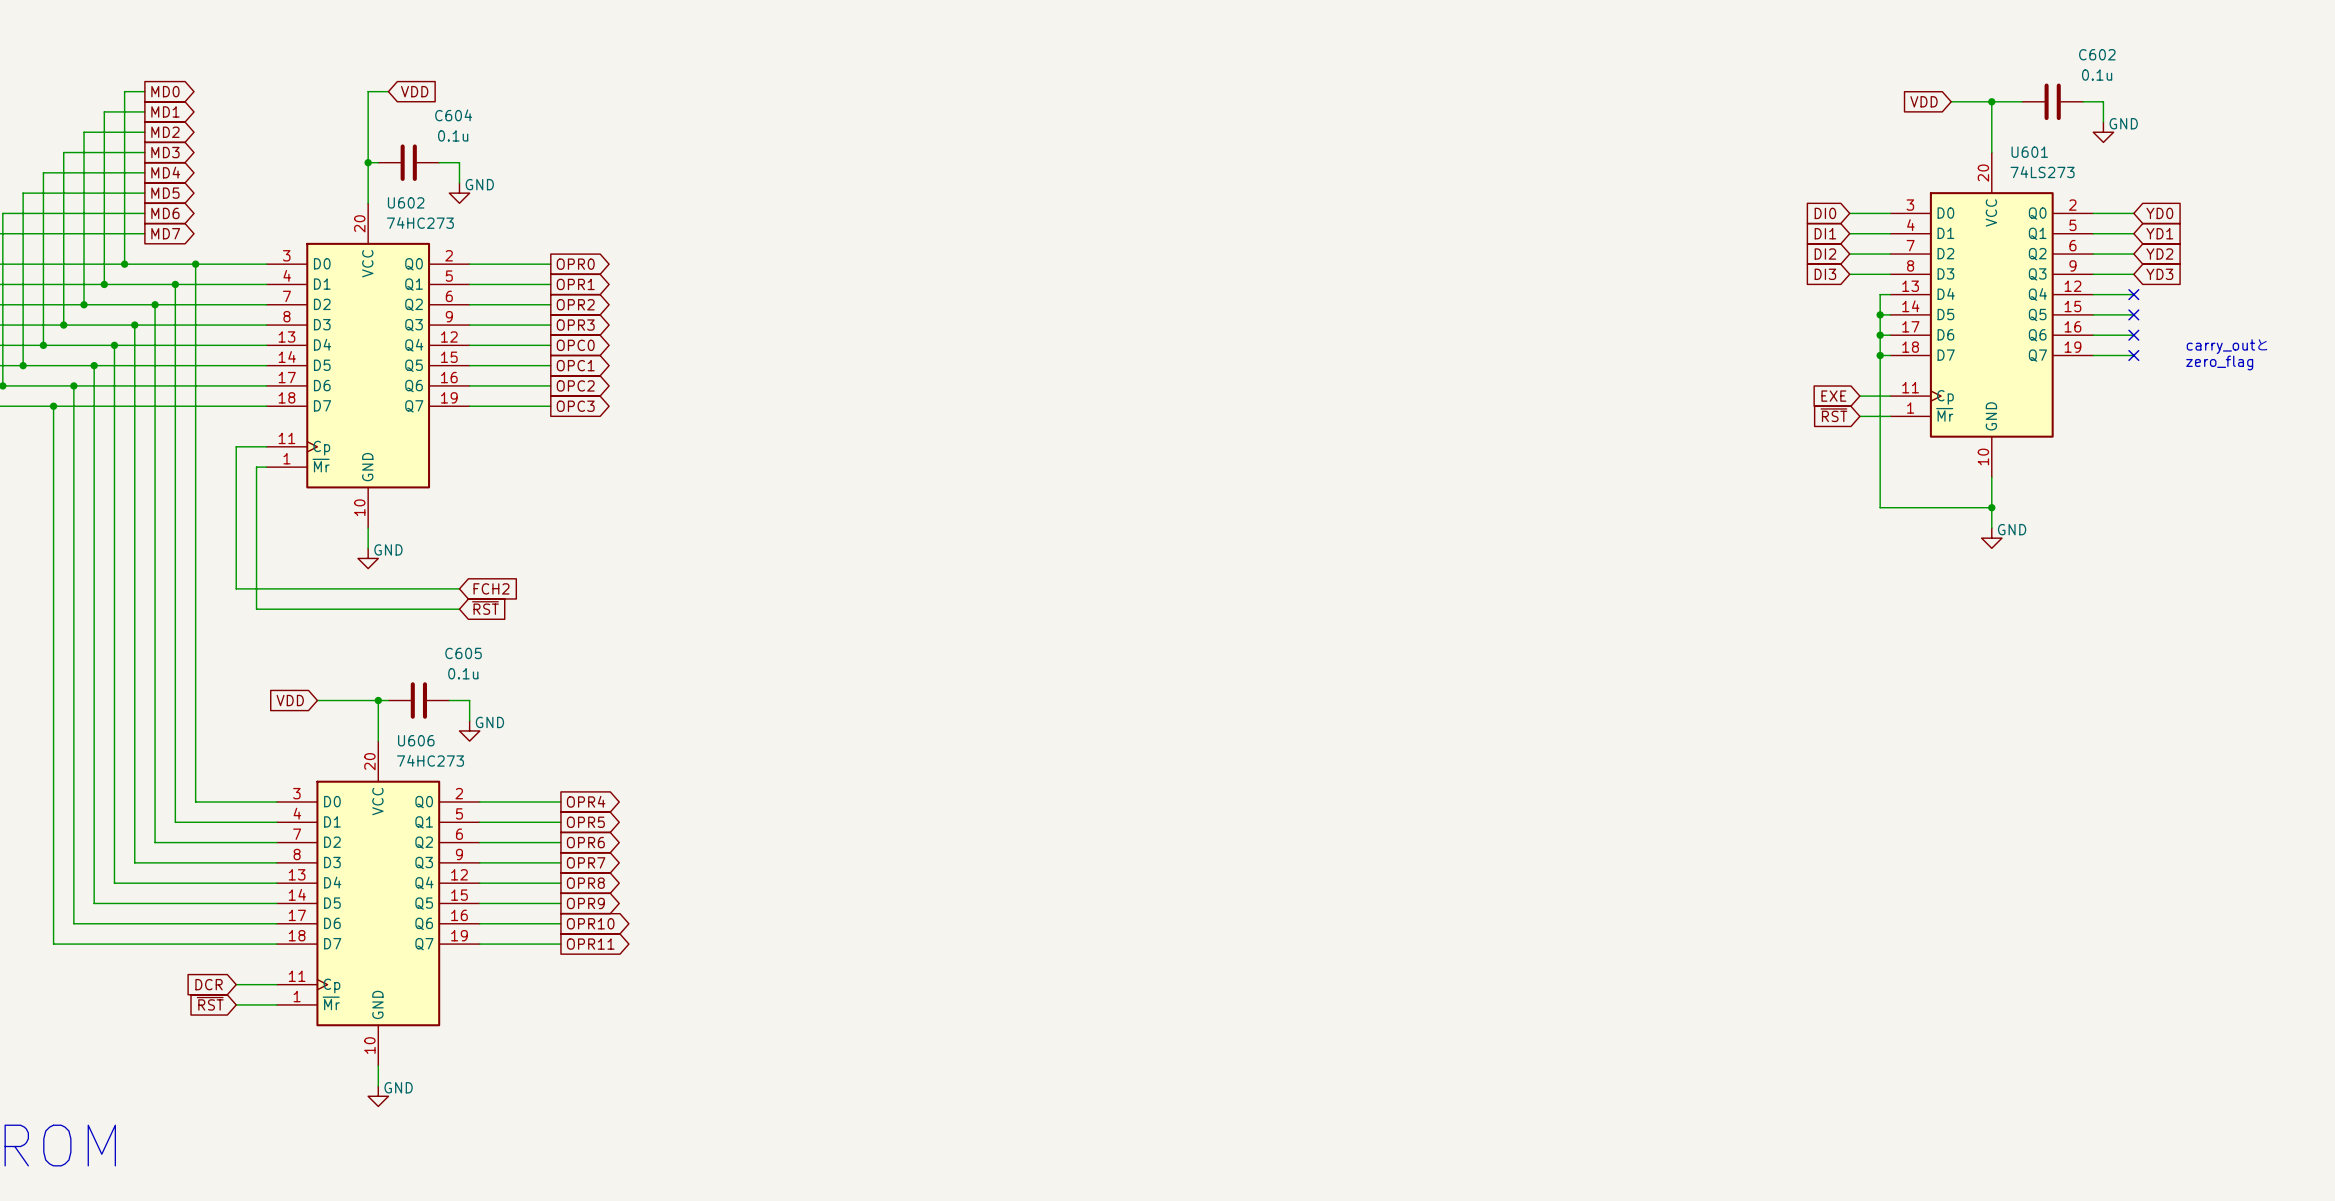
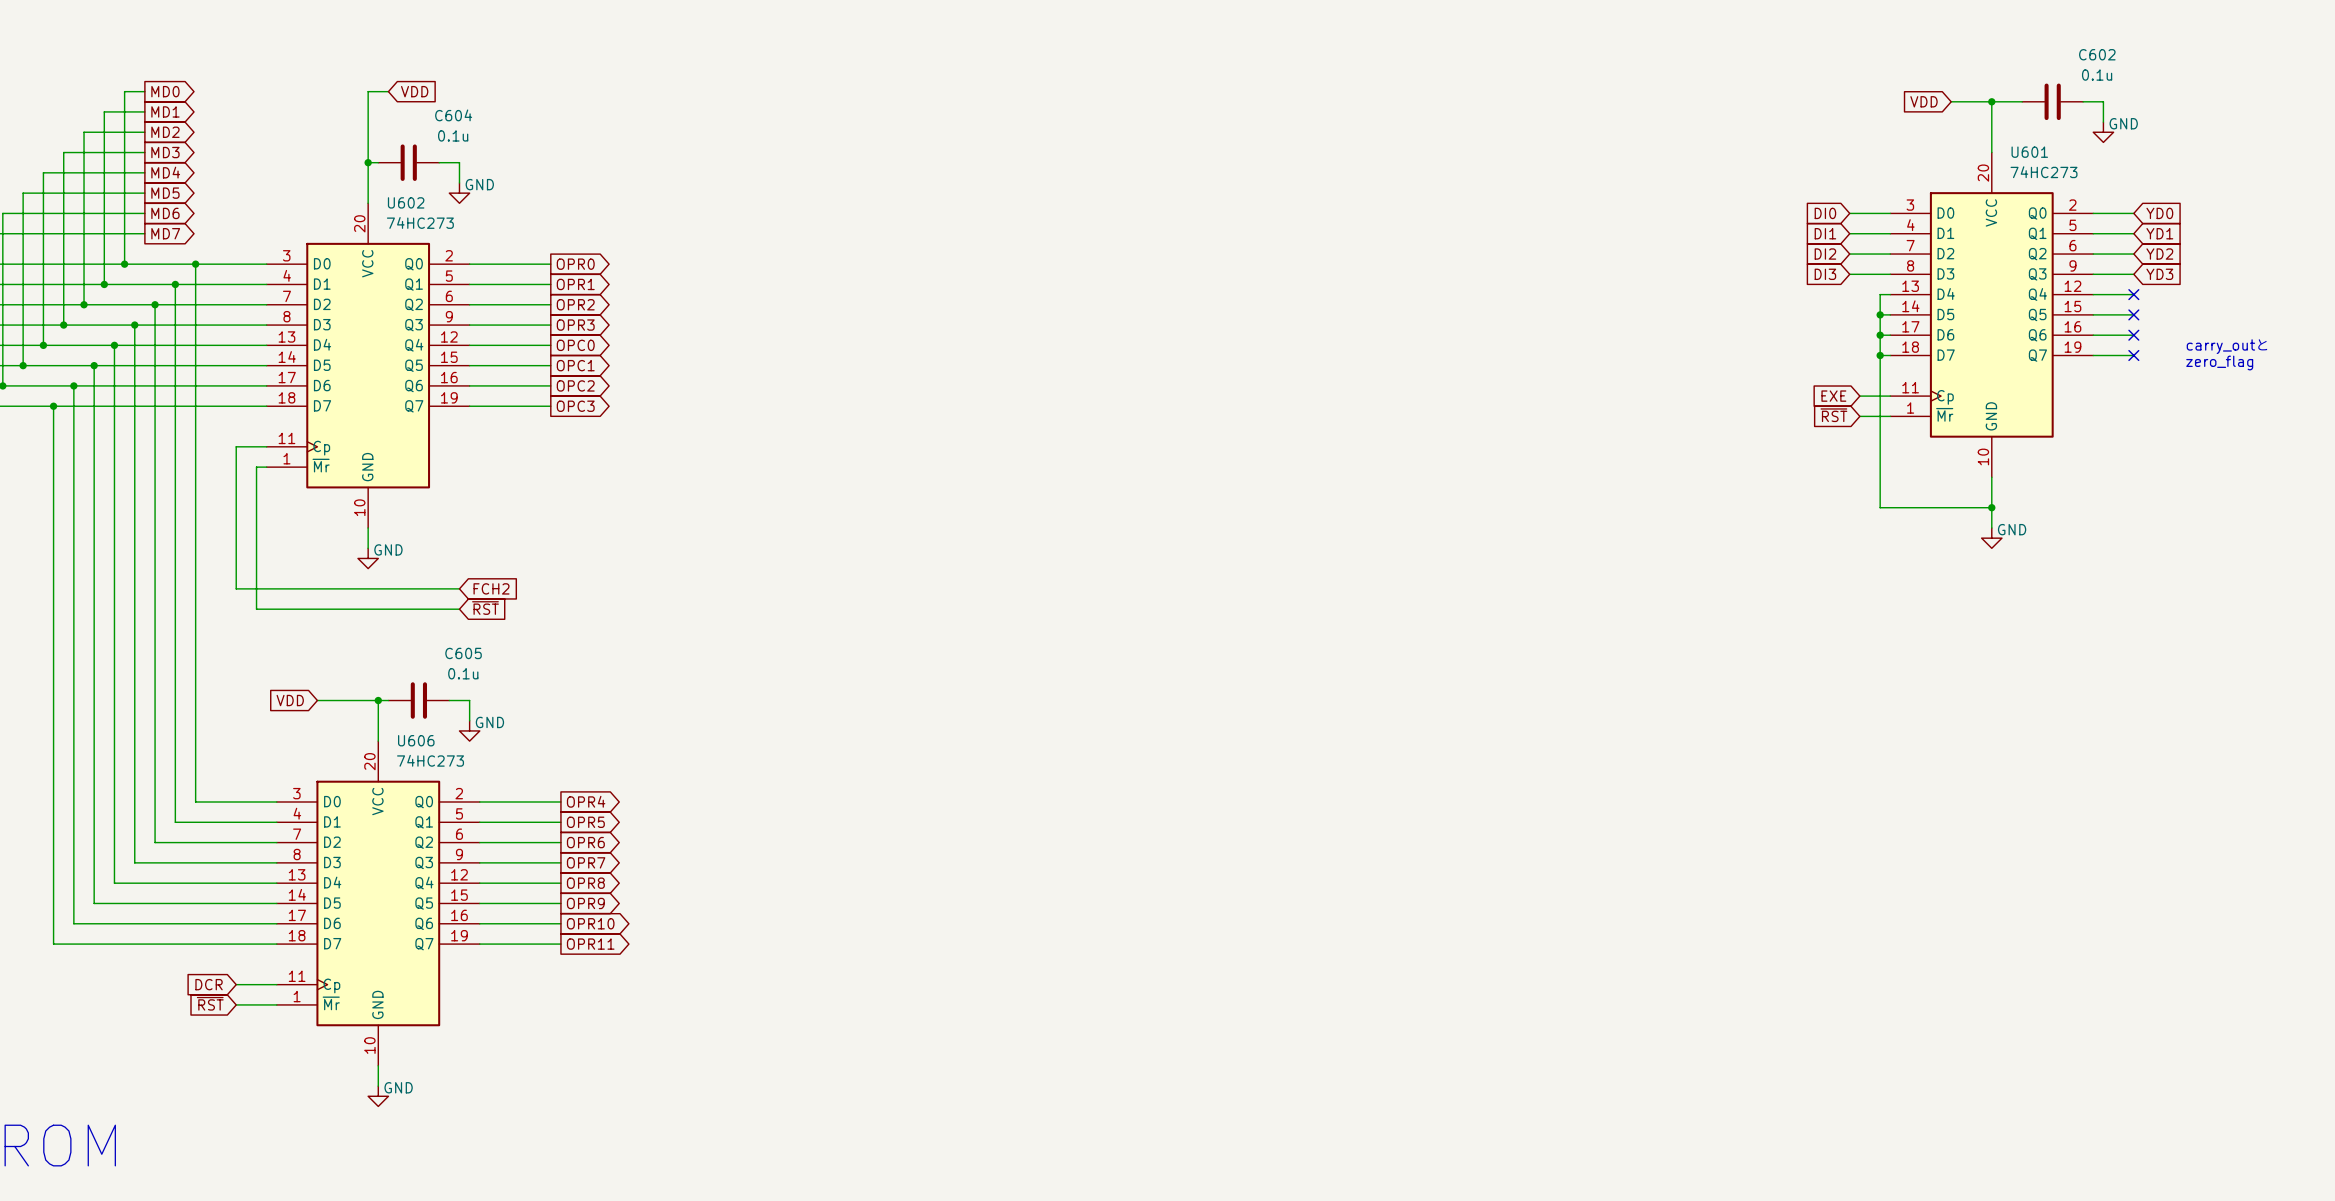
U601 value: 74LS273 (2042, 172) -> 74HC273 (2044, 172)

